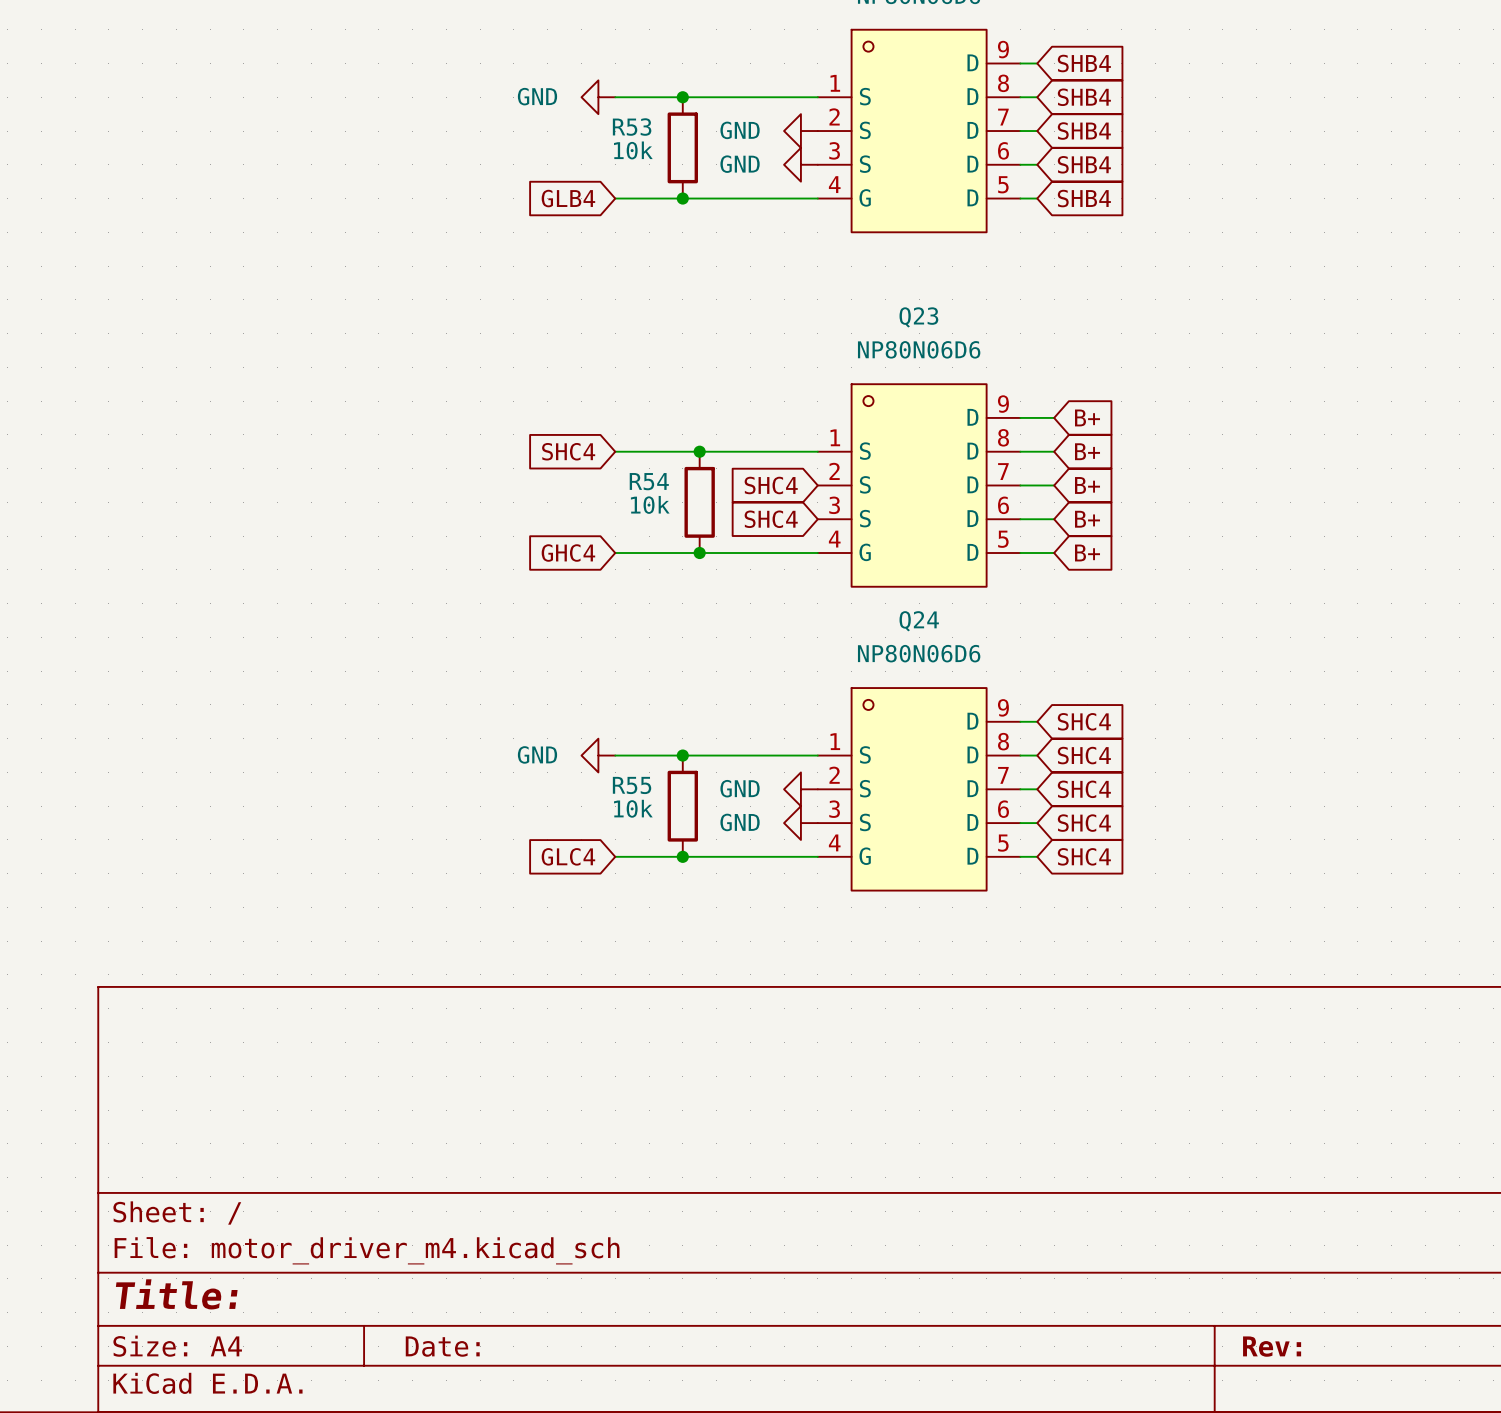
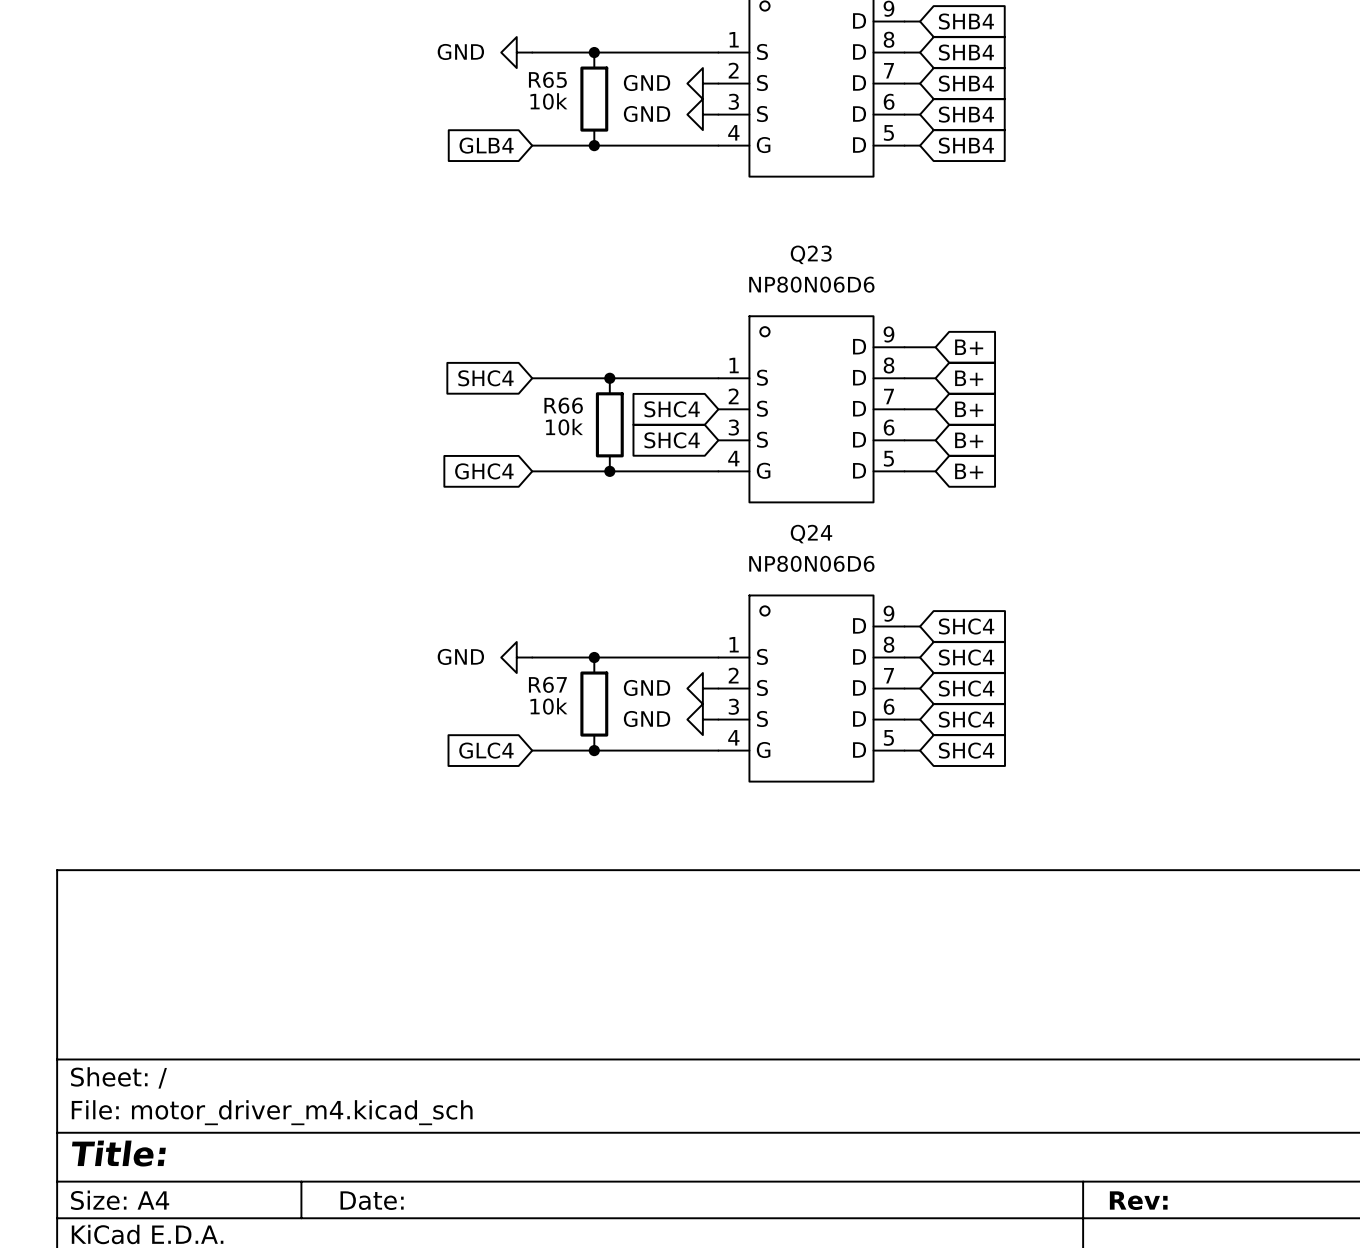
R53 name: R53 (632, 127) -> R65 (547, 79)
R54 name: R54 (649, 481) -> R66 (563, 405)
R55 name: R55 (632, 785) -> R67 (547, 684)

